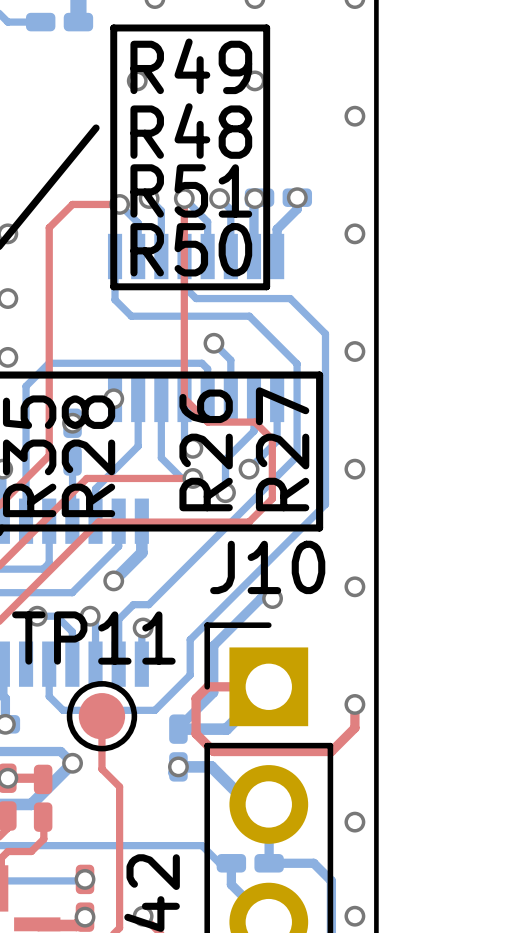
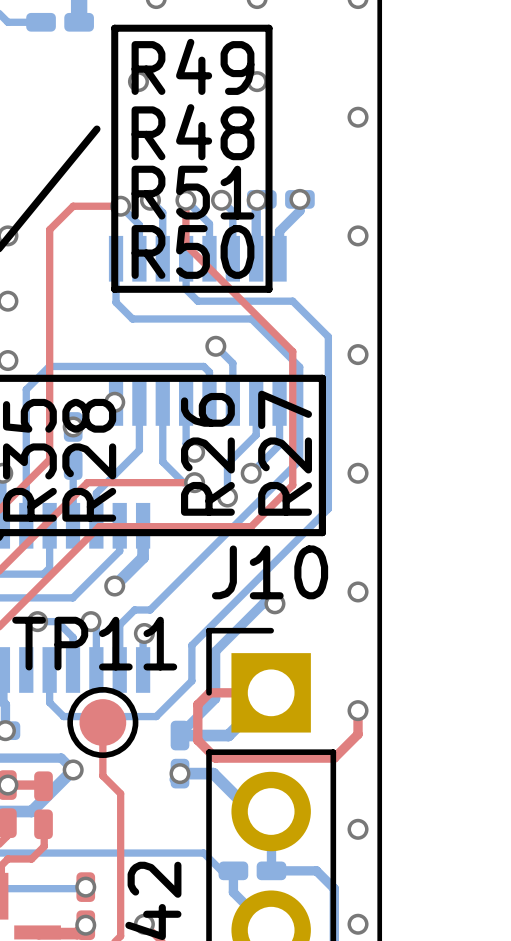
top track: (184, 242) (184, 398) (207, 422) (254, 422) (272, 439) (272, 498) -> (185, 244) (292, 351) (292, 485) (274, 503)

